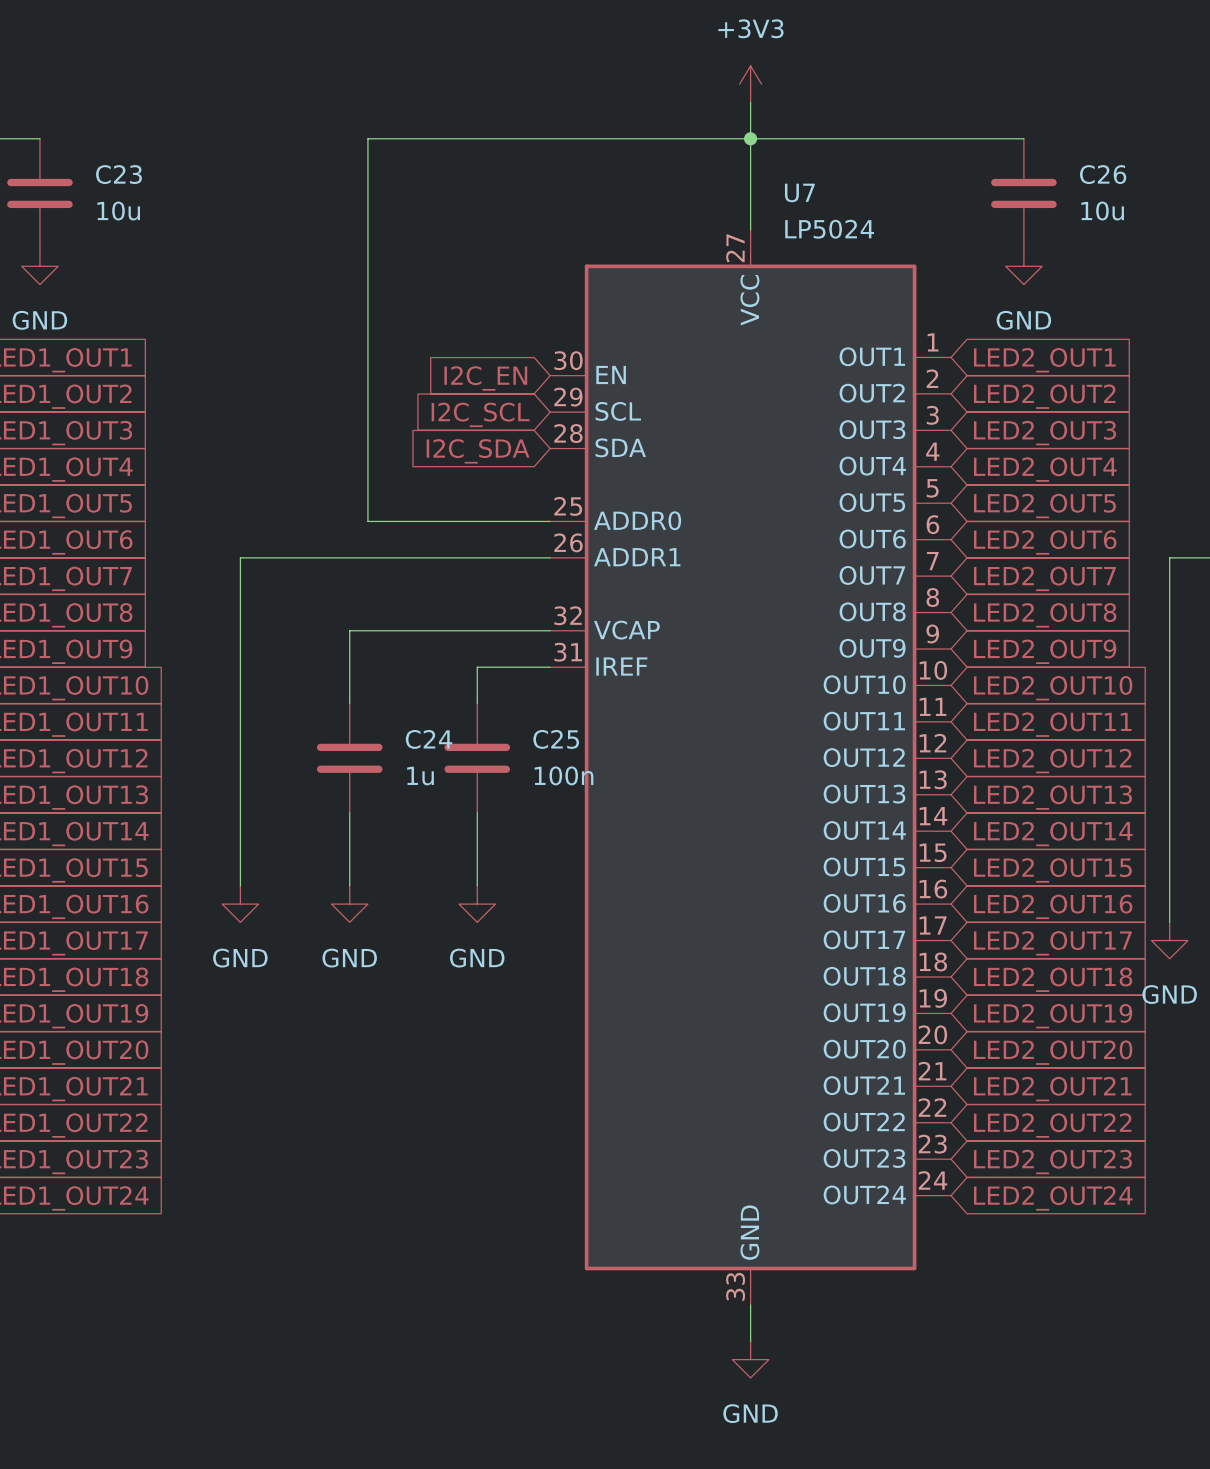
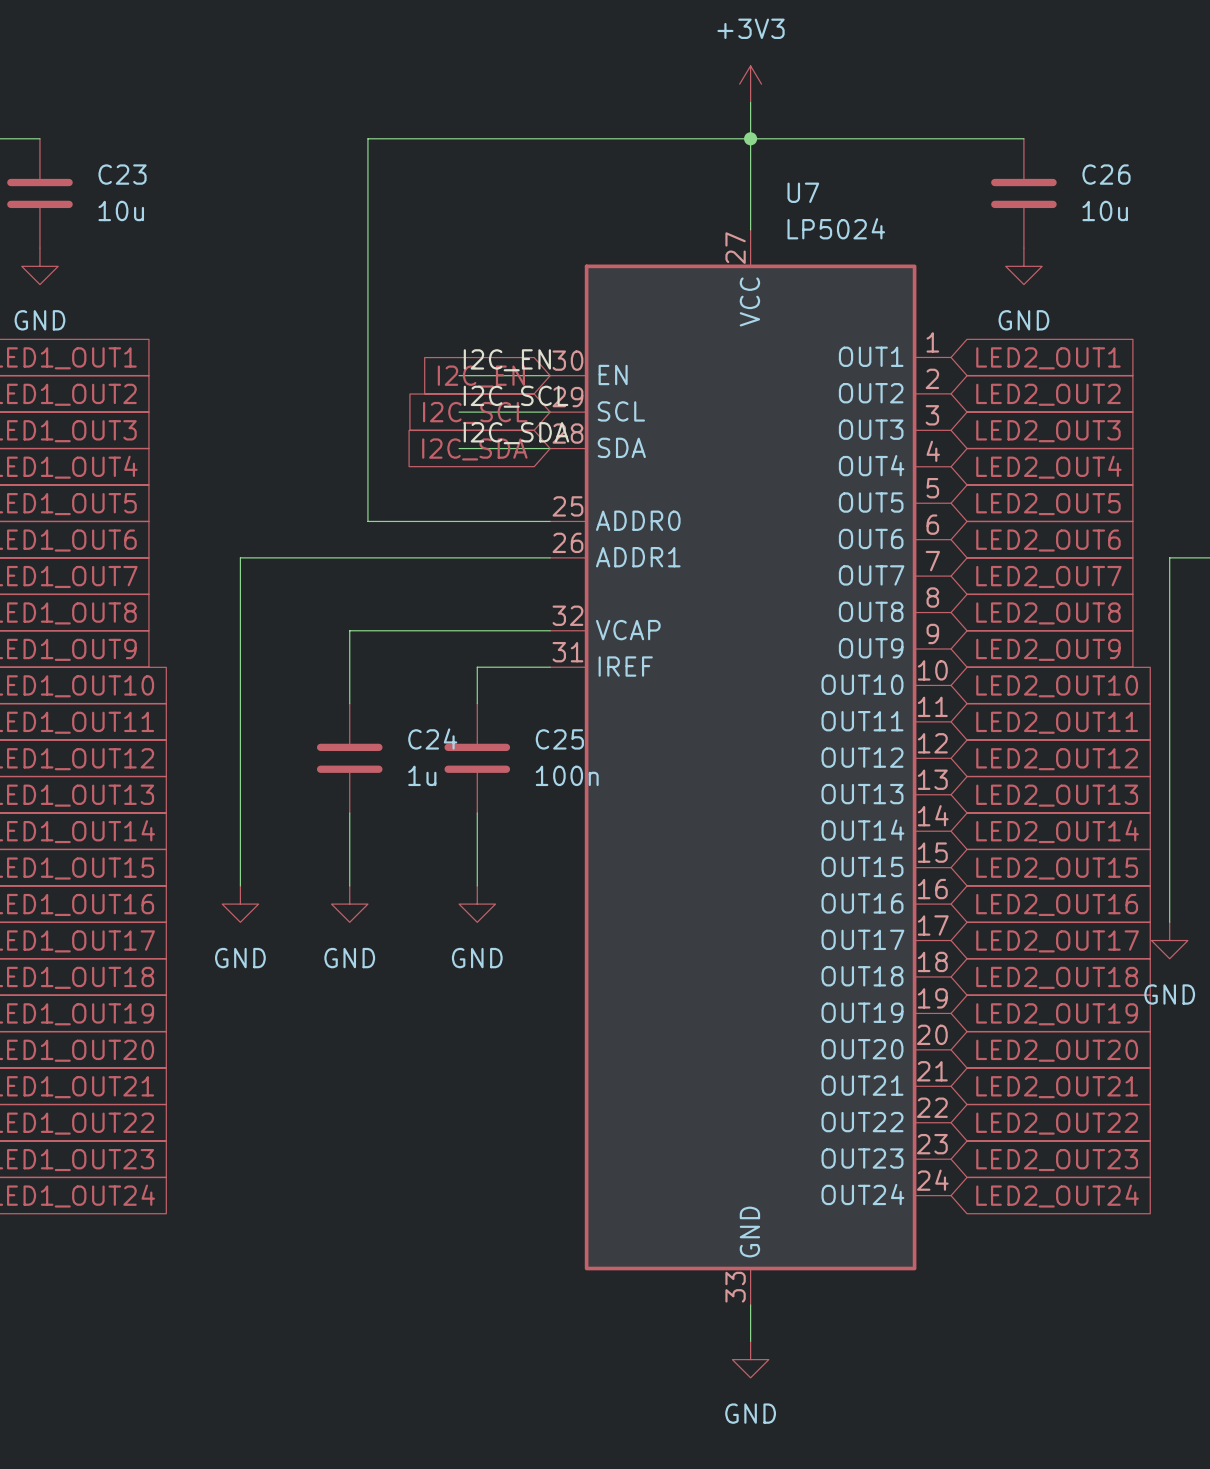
label: none -> I2C_EN (507, 360)
wire: none -> (459, 375) (550, 375)
label: none -> I2C_SCL (516, 396)
wire: none -> (459, 412) (550, 412)
label: none -> I2C_SDA (516, 433)
wire: none -> (459, 448) (550, 448)

